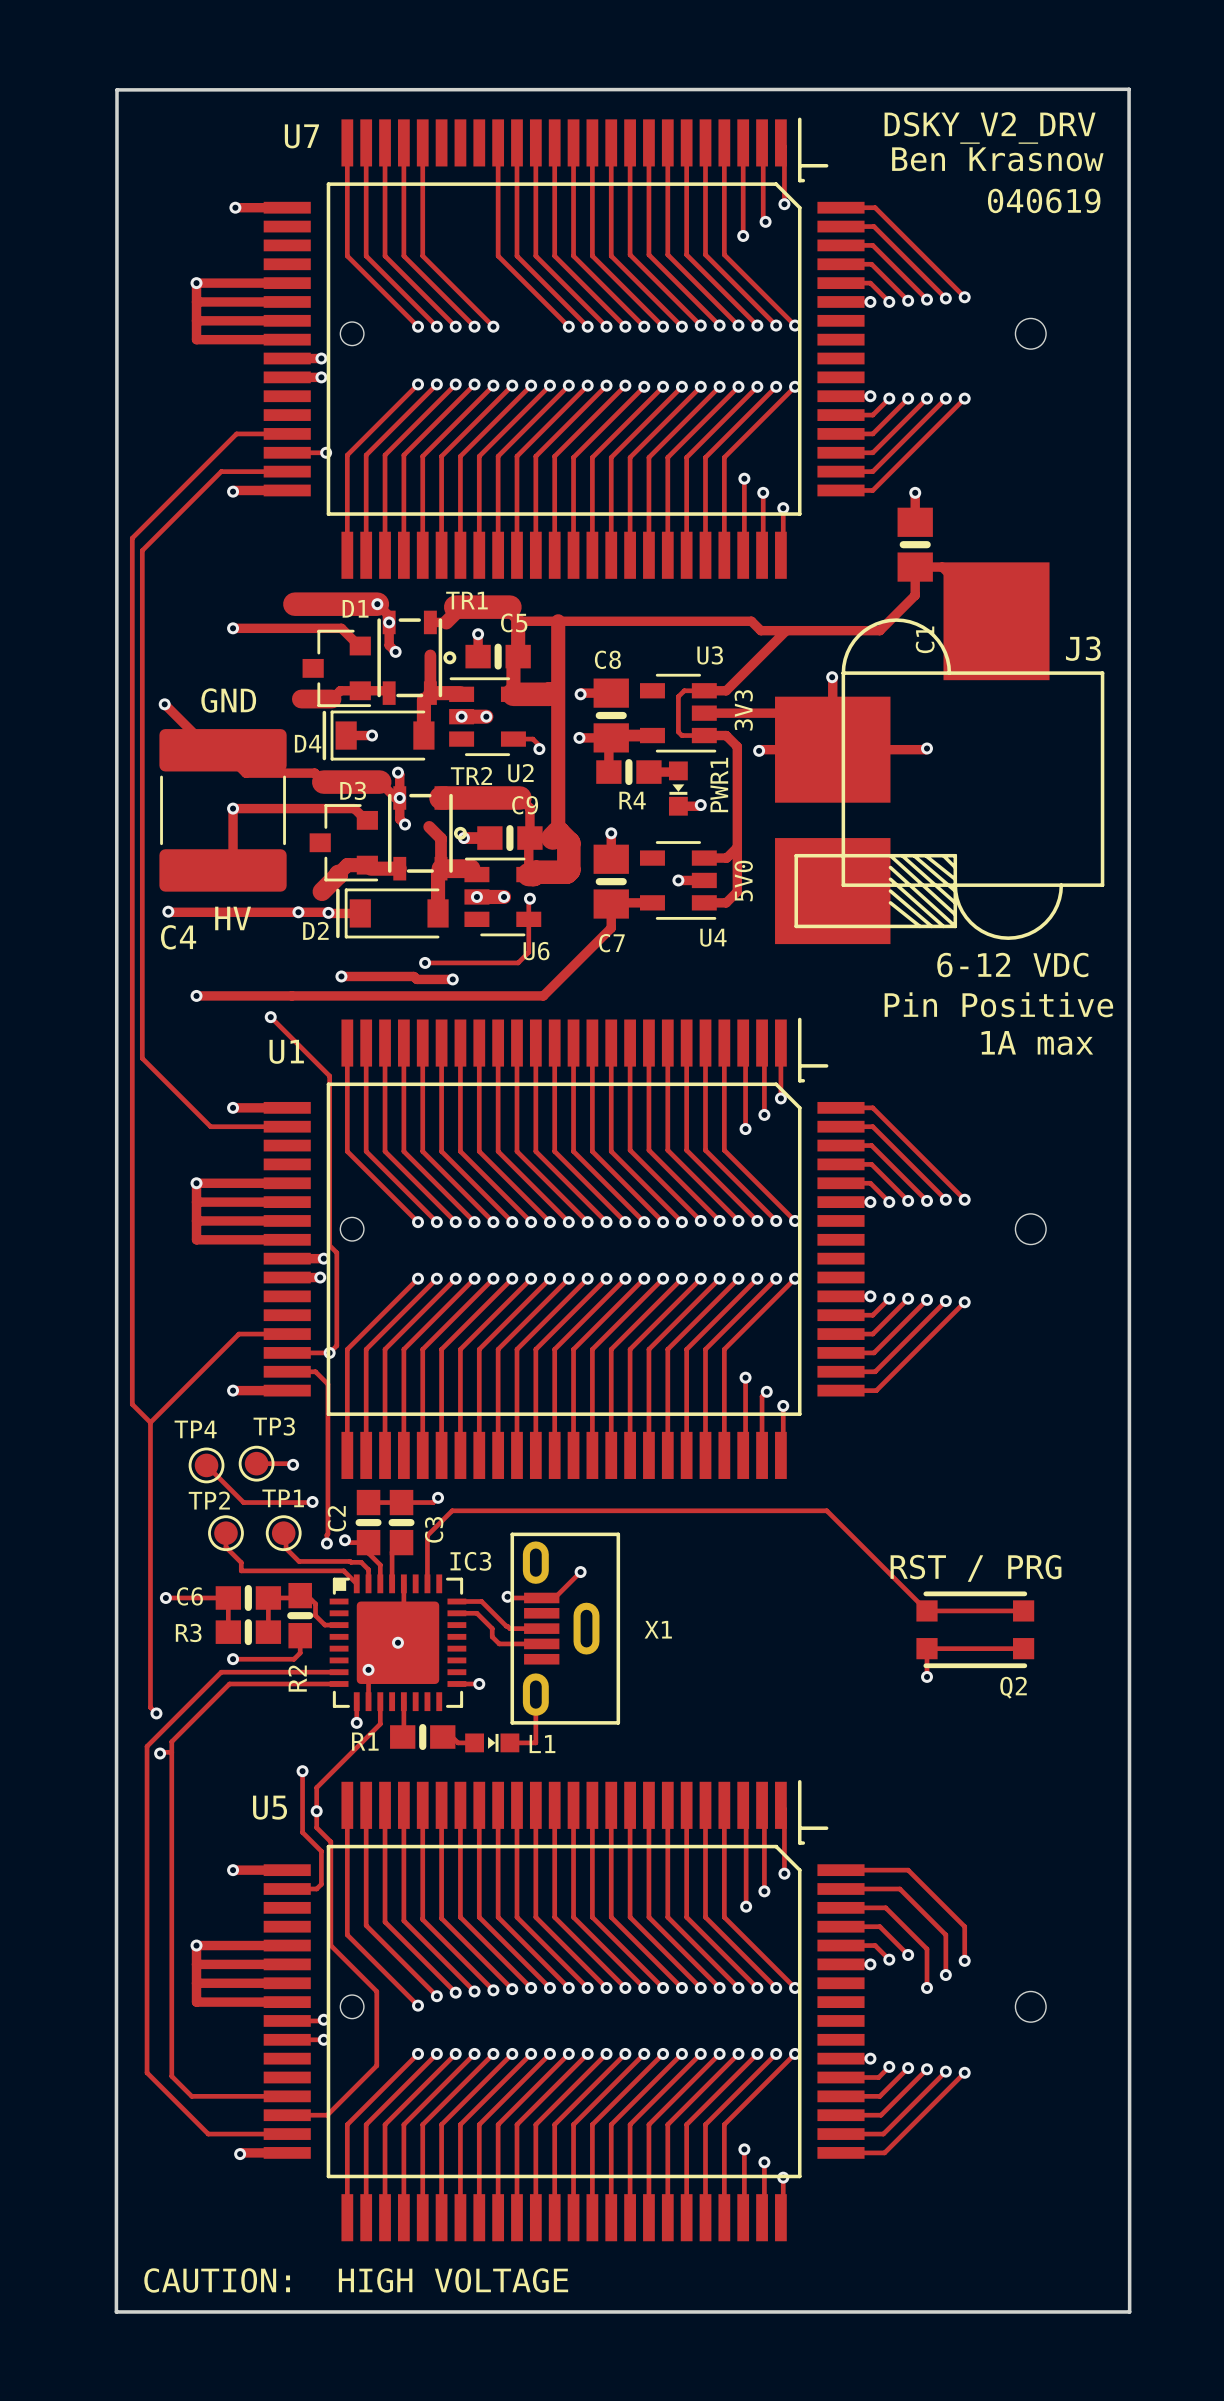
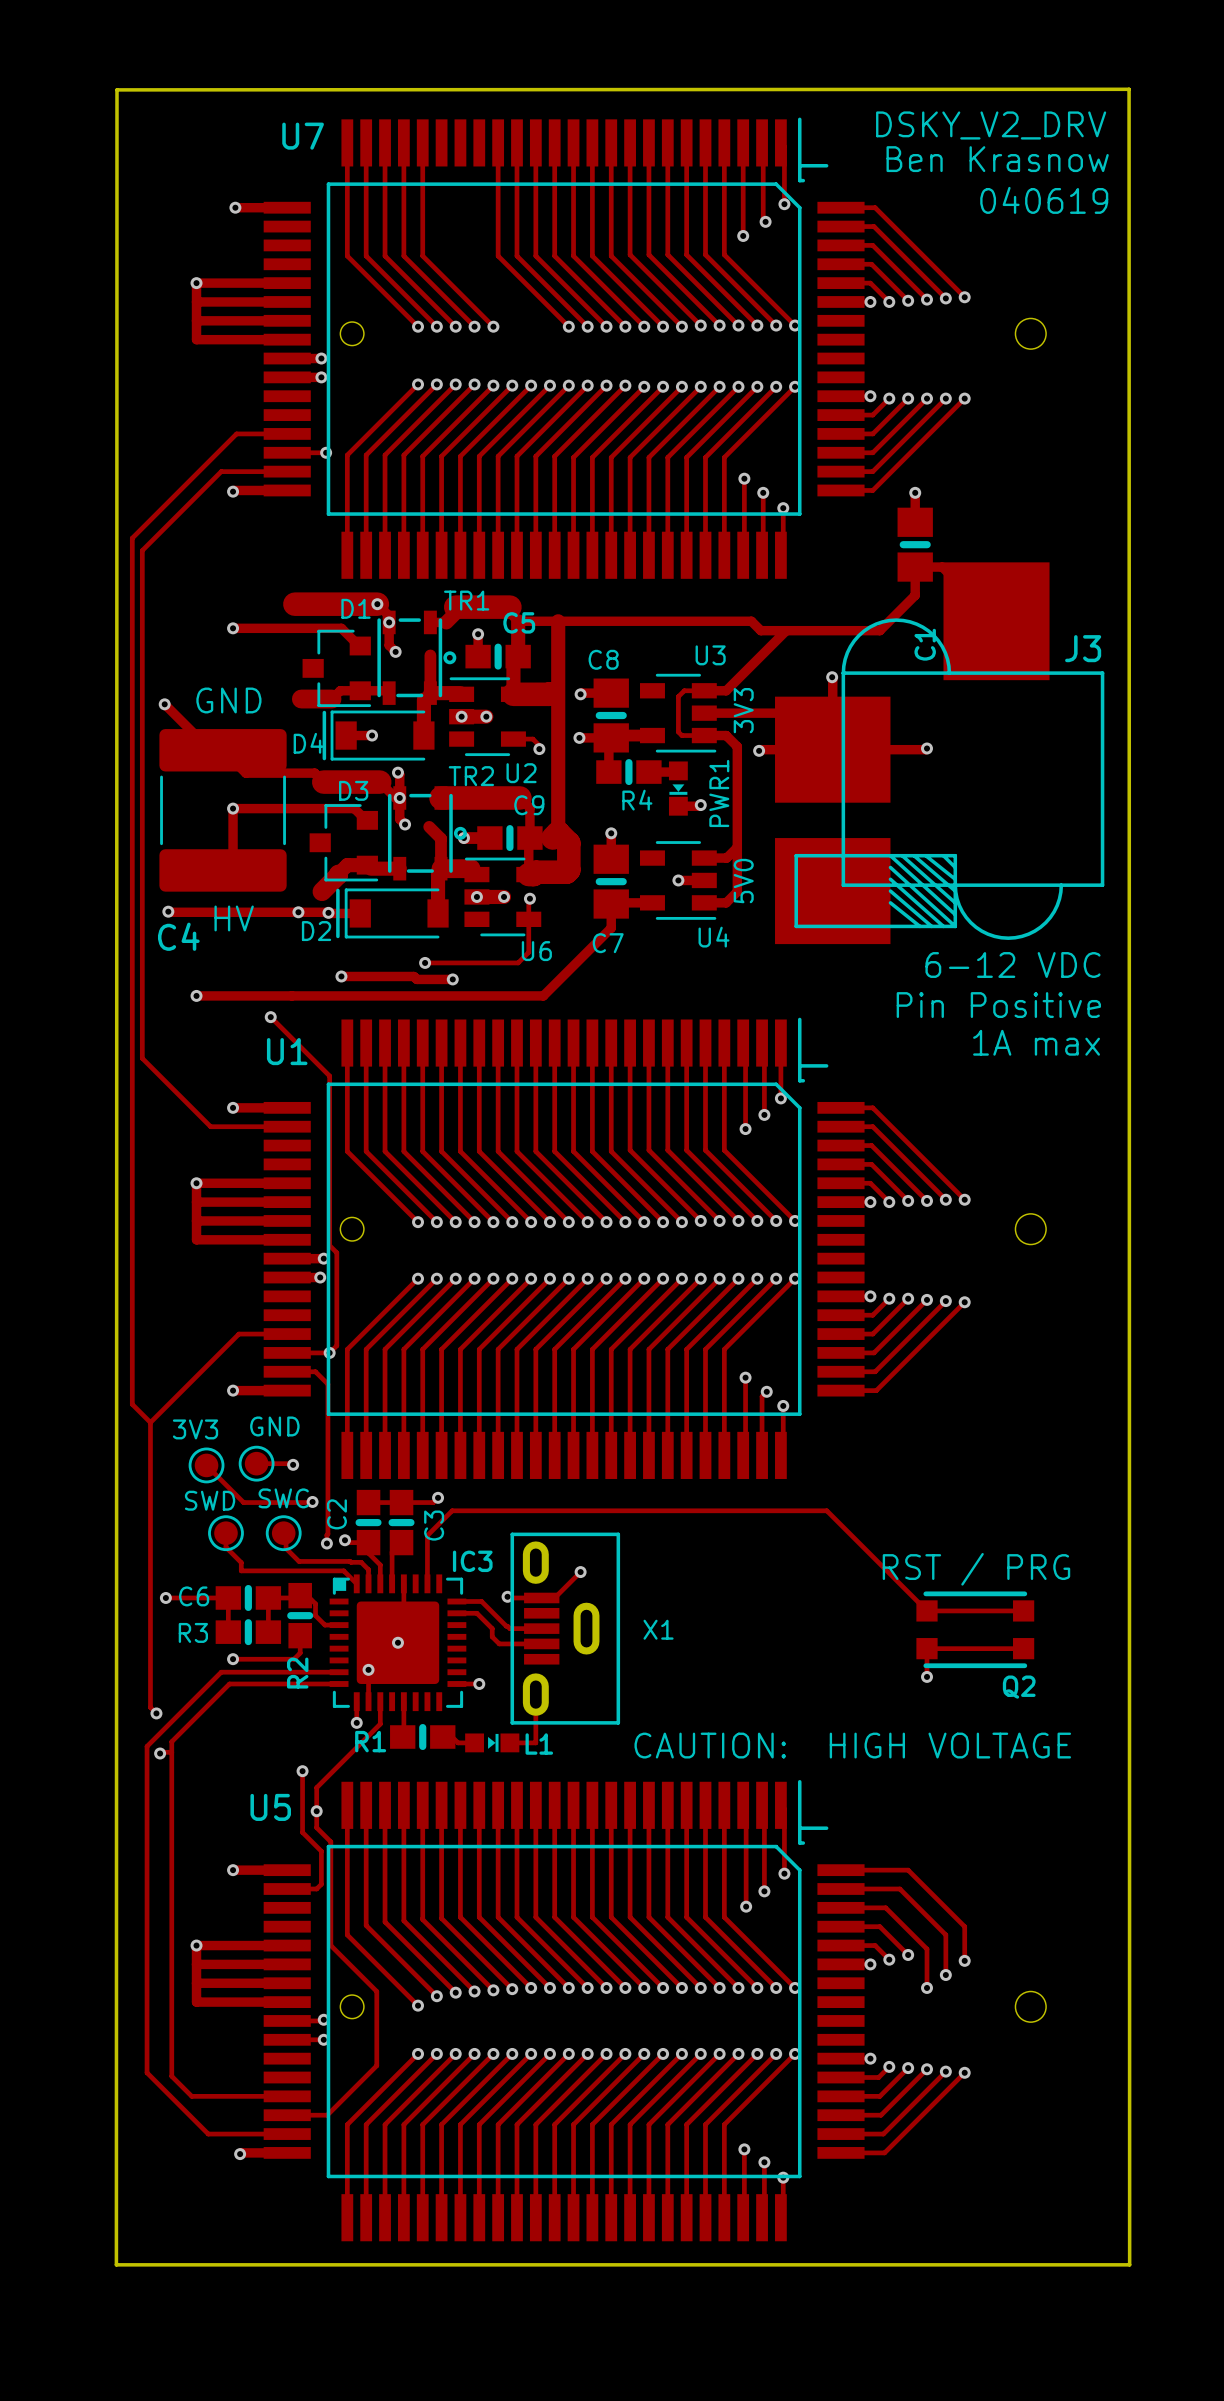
board edge: (1129, 89) (1129, 2311) (116, 2311) (116, 89) -> (1129, 89) (1129, 2264) (116, 2264) (116, 89)
TP3 name: TP3 (274, 1426) -> GND (274, 1426)
TP4 name: TP4 (195, 1429) -> 3V3 (195, 1429)
TP1 name: TP1 (283, 1498) -> SWC (283, 1498)
TP2 name: TP2 (209, 1500) -> SWD (210, 1500)
text: none -> CAUTION: HIGH VOLTAGE (852, 1745)
text: CAUTION: HIGH VOLTAGE (356, 2280) -> none

